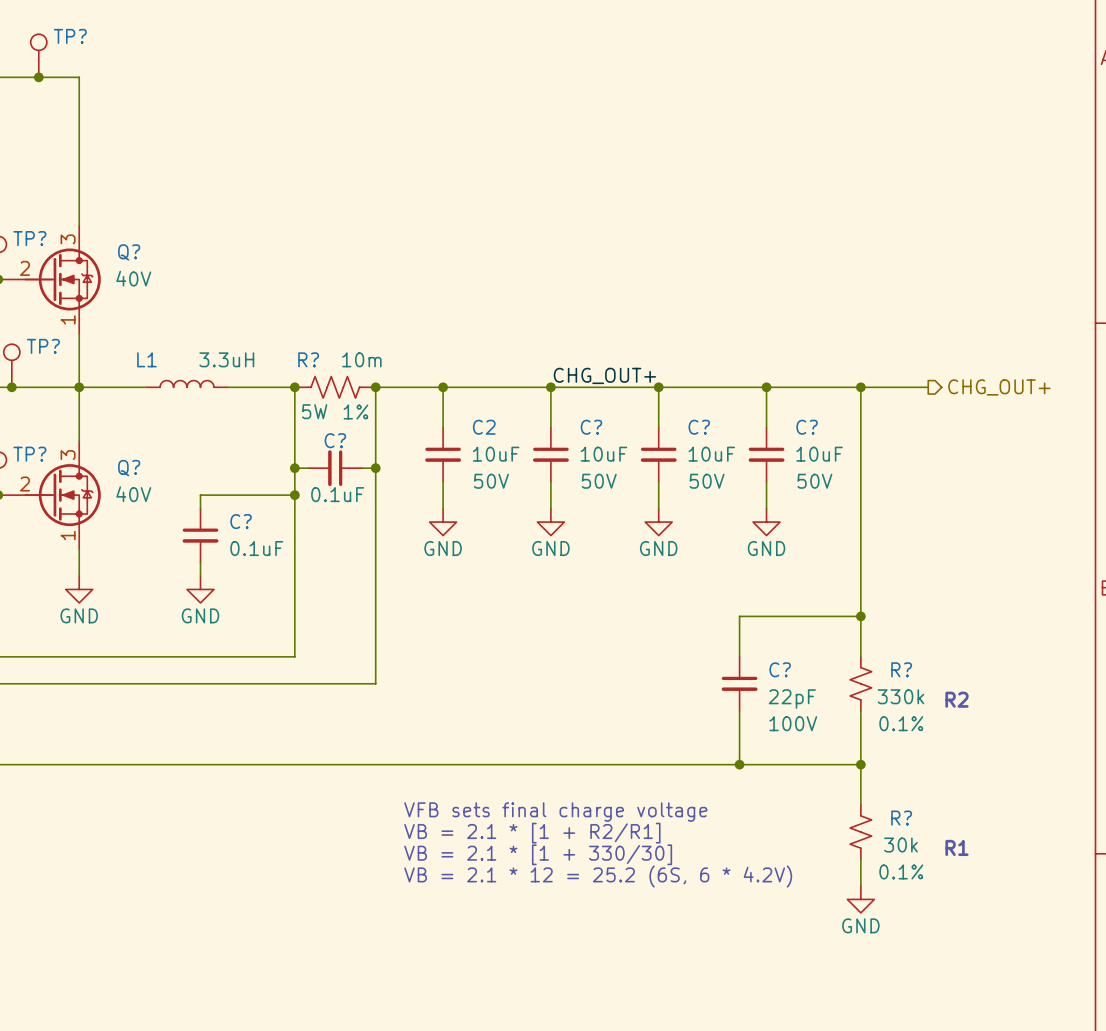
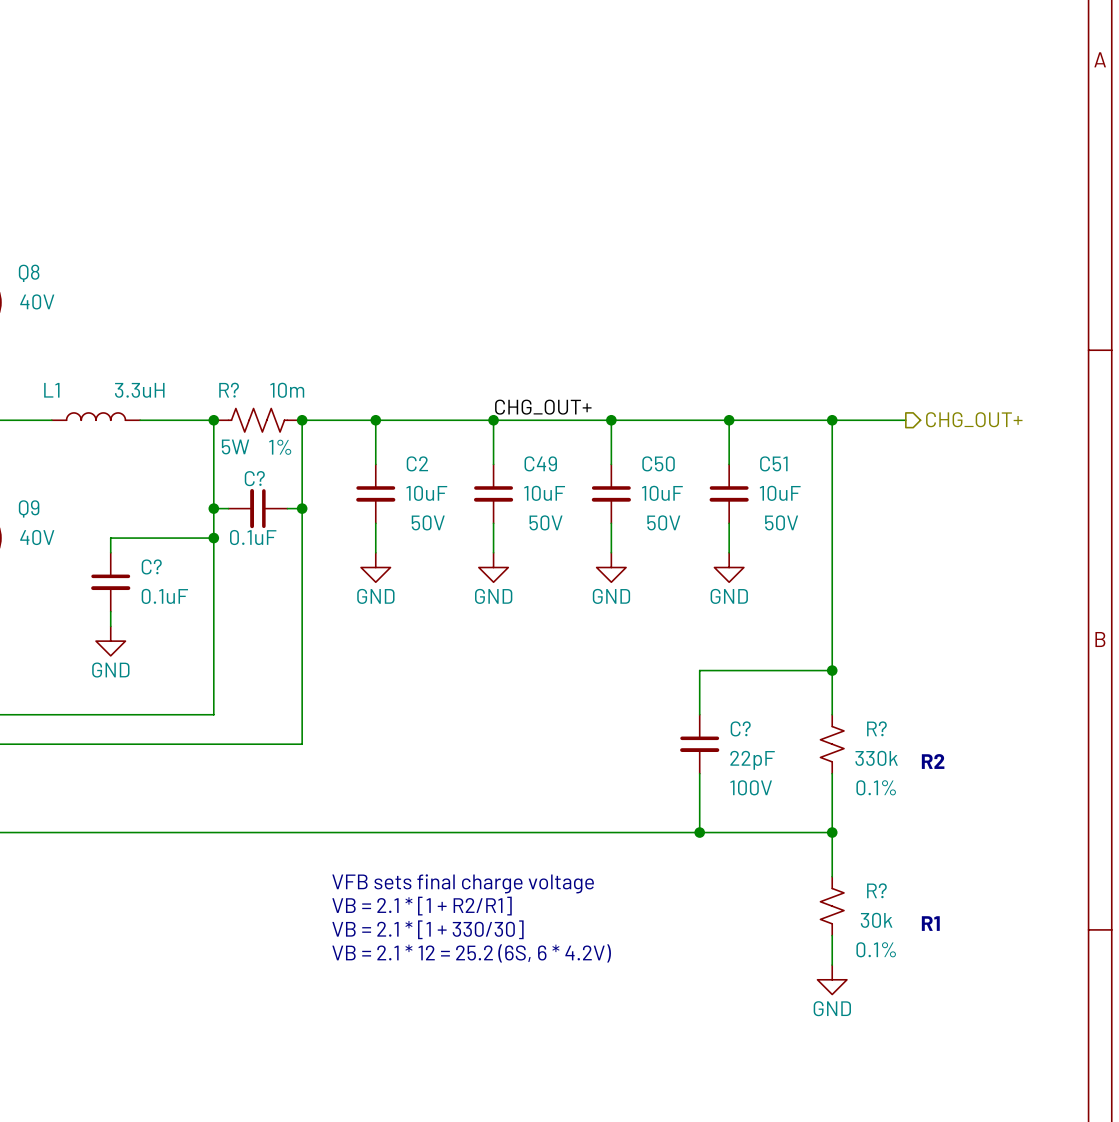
Q? name: Q? (129, 252) -> Q8 (29, 273)
C? name: C? (591, 427) -> C49 (540, 463)
C? name: C? (699, 427) -> C50 (658, 463)
C? name: C? (807, 427) -> C51 (773, 463)
Q? name: Q? (129, 468) -> Q9 (29, 508)

